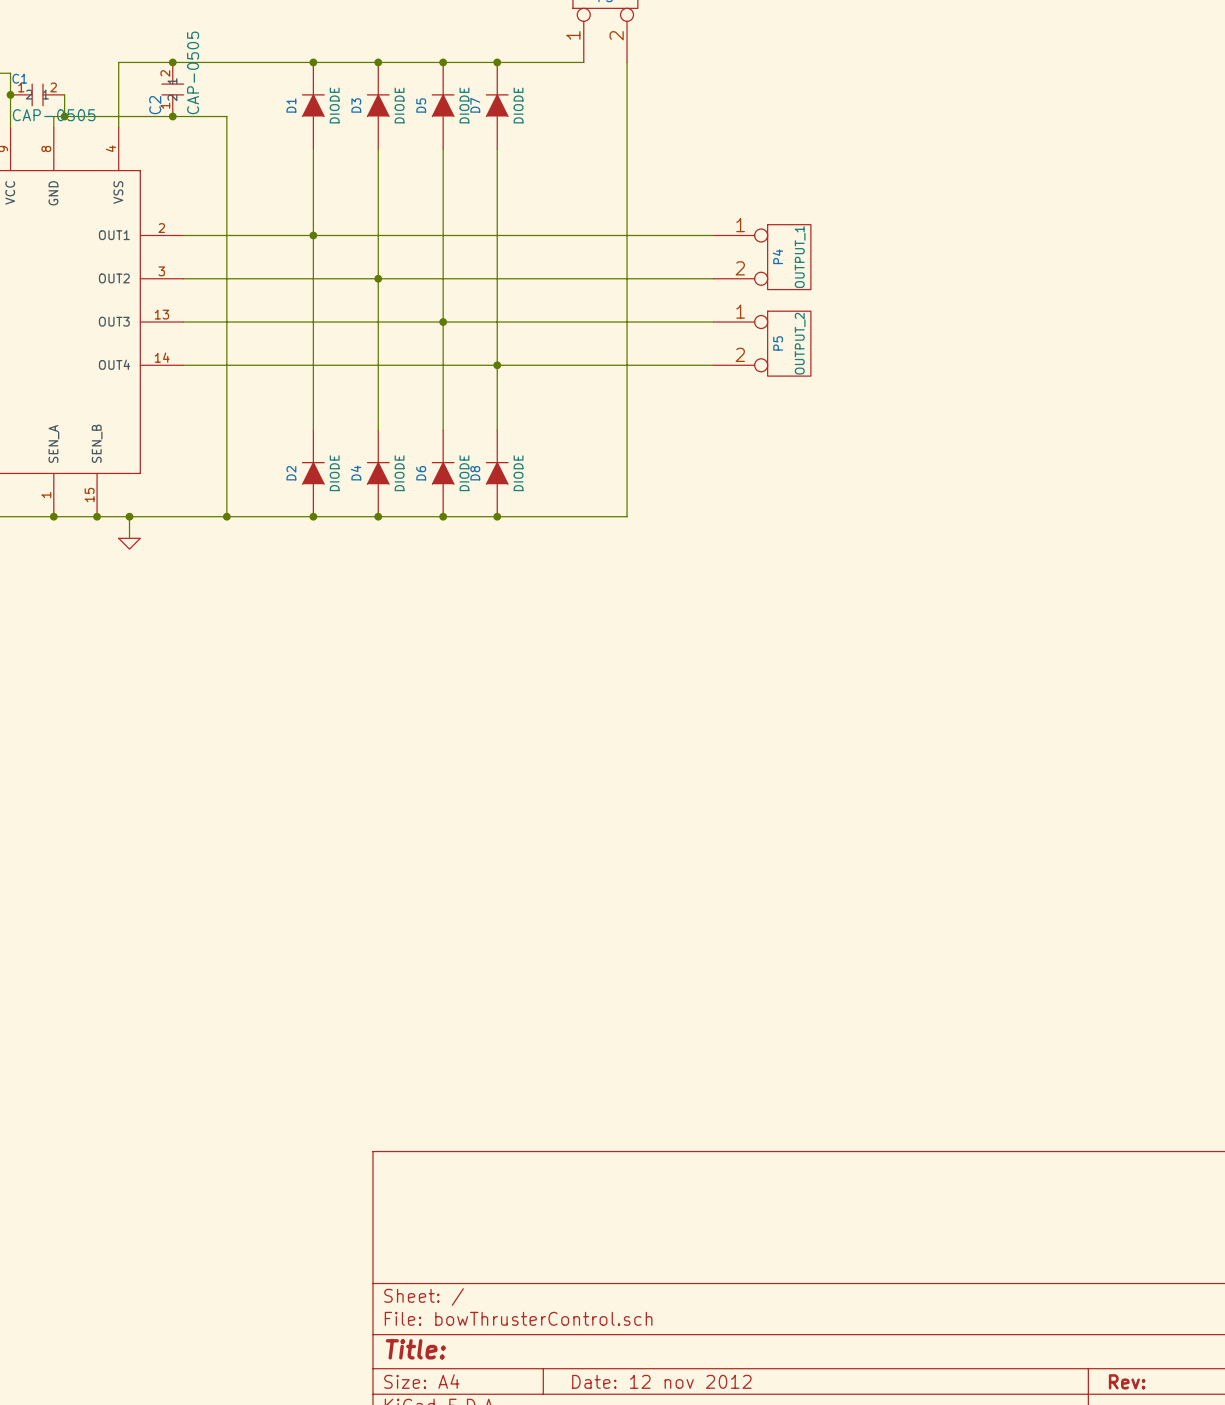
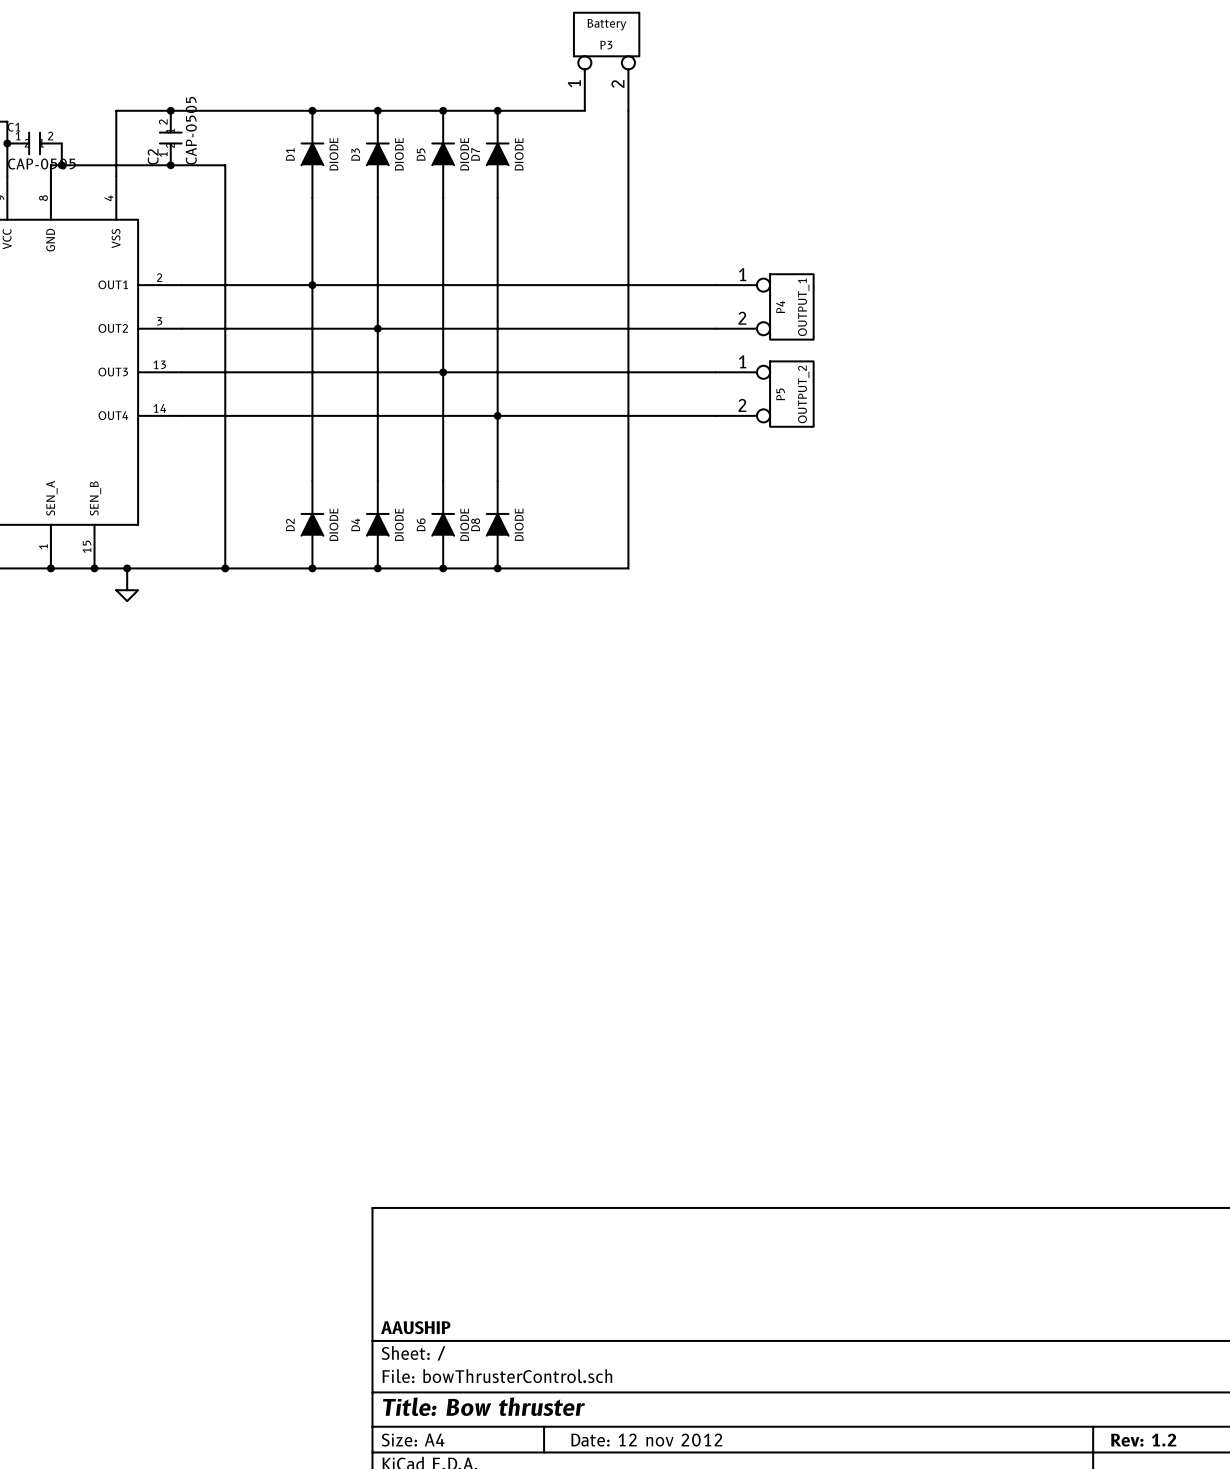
title block: none -> AAUSHIP (415, 1327)
title block: Title: (415, 1349) -> Title: Bow thruster (483, 1406)
title block: Rev: (1127, 1381) -> Rev: 1.2 (1143, 1440)

